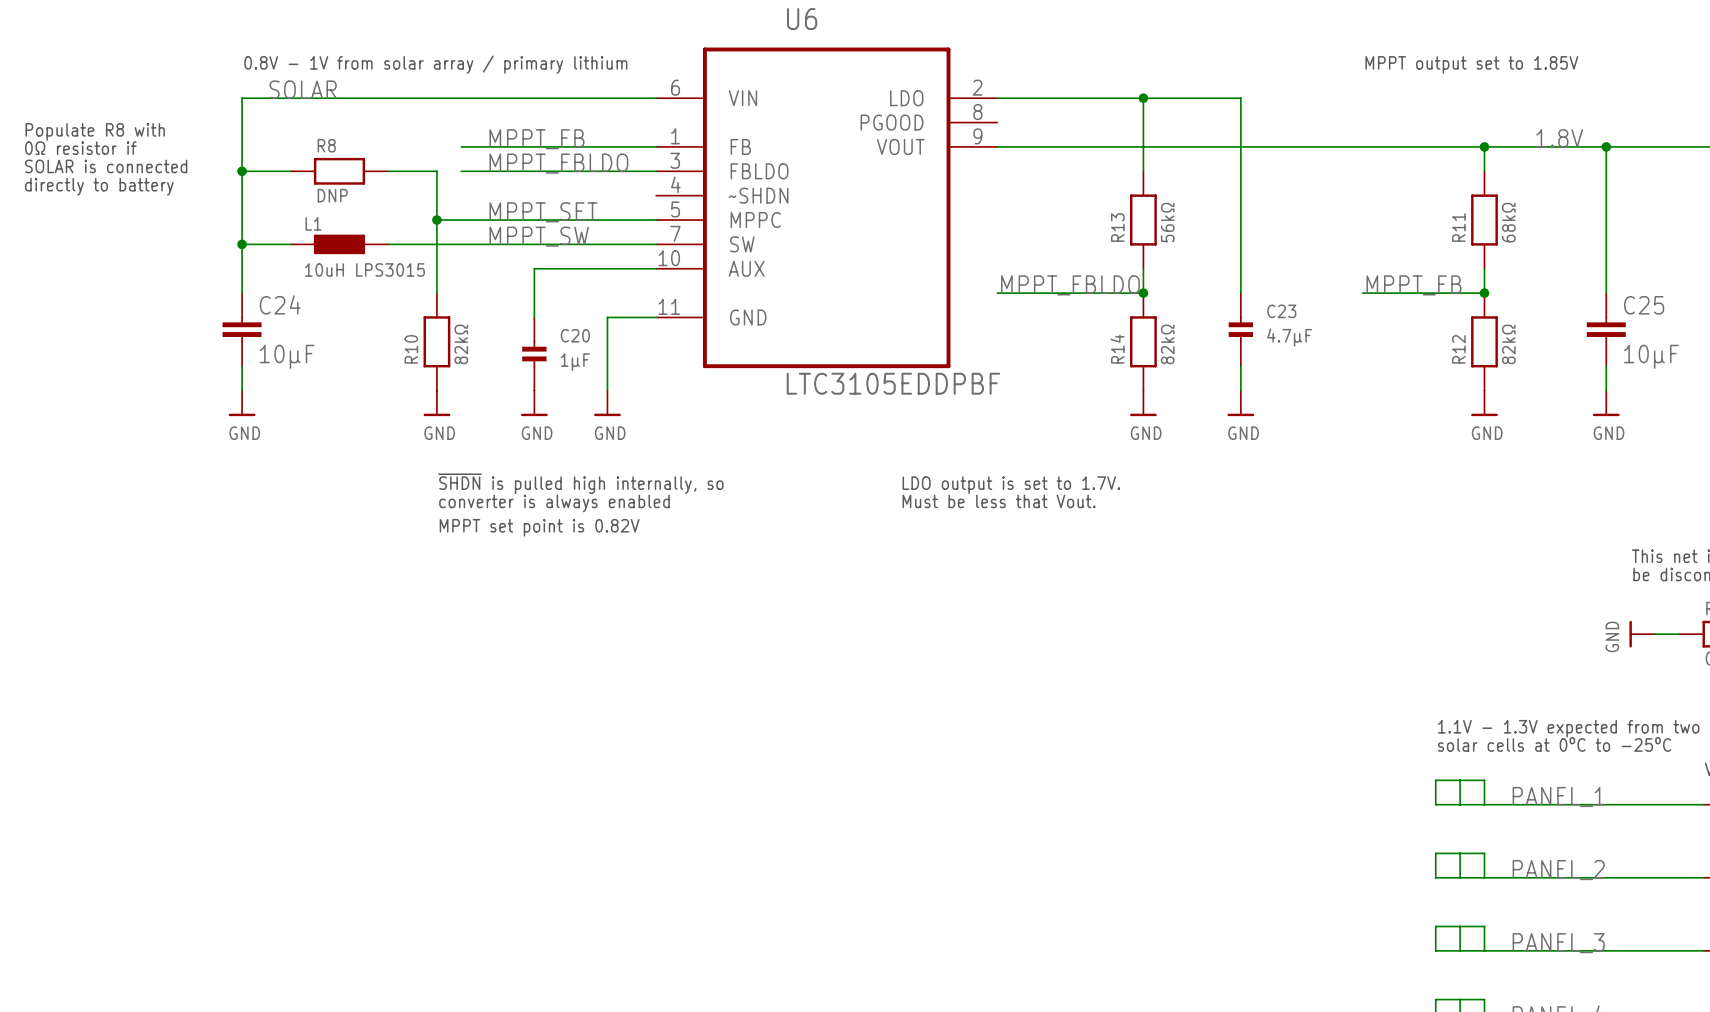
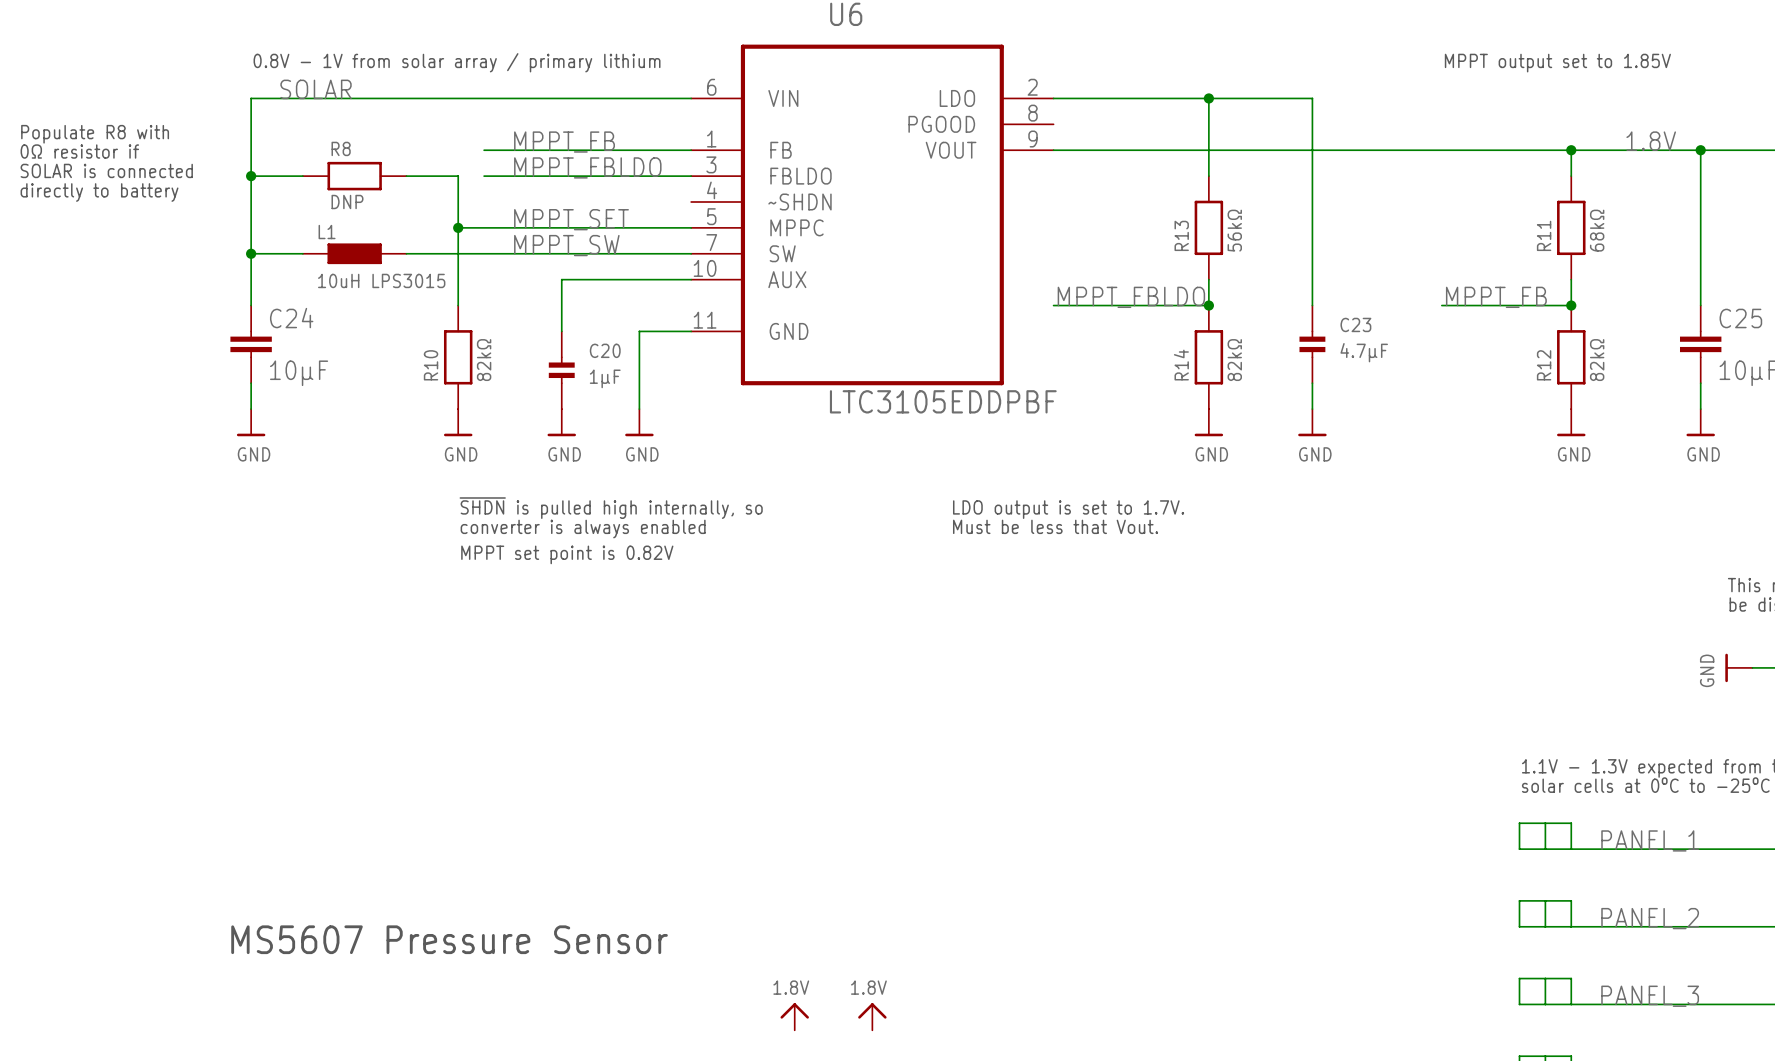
text: none -> MS5607 Pressure Sensor (449, 939)
power symbol: none -> 1.8V (794, 1016)
power symbol: none -> 1.8V (872, 1016)

